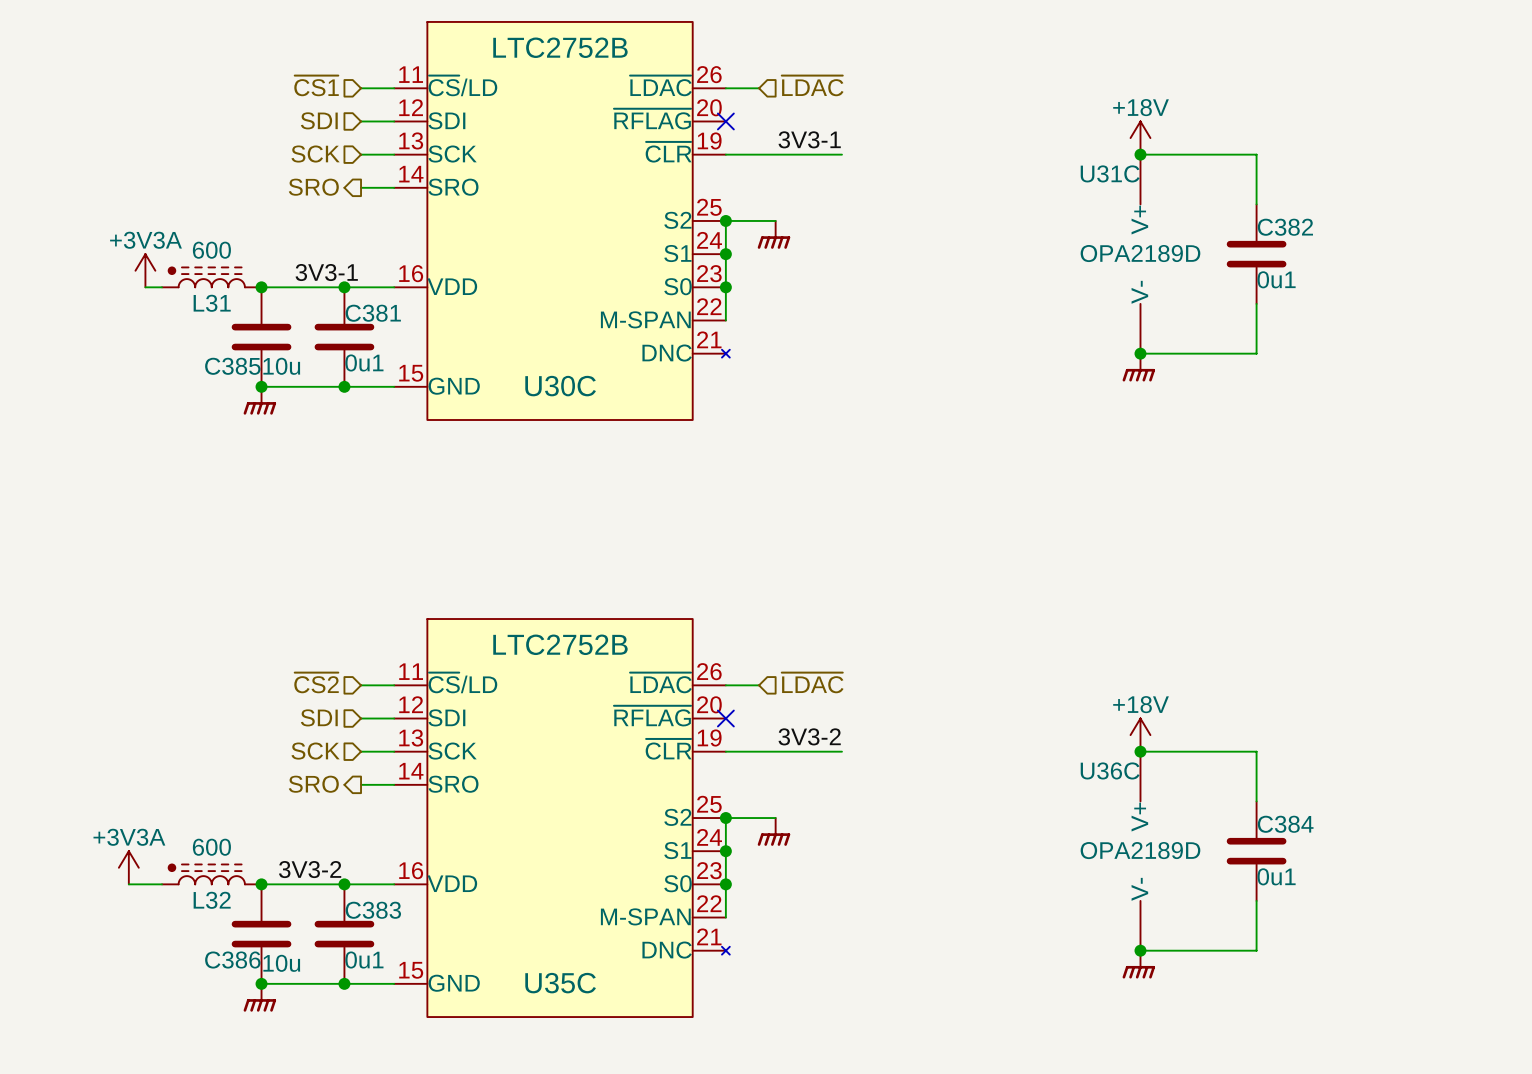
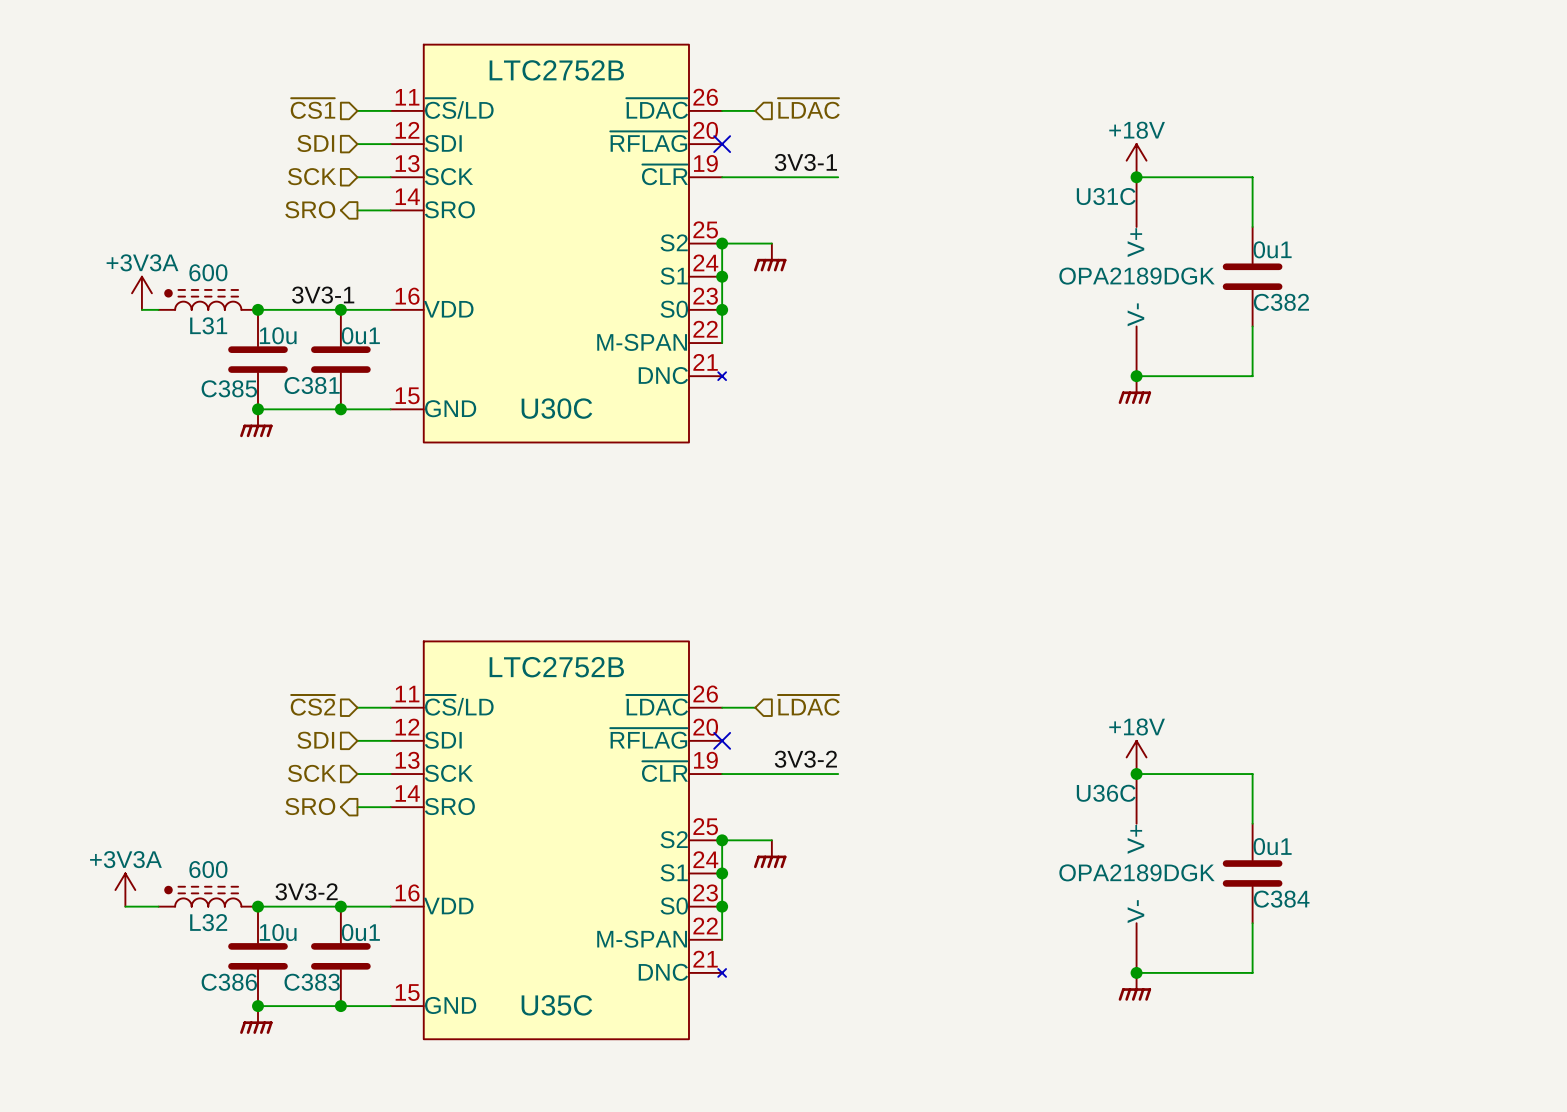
C382 name position: C382 (1285, 227) -> C382 (1281, 302)
U31C value: OPA2189D (1140, 253) -> OPA2189DGK (1137, 276)
C382 value position: 0u1 (1276, 279) -> 0u1 (1272, 249)
C381 name position: C381 (373, 313) -> C381 (312, 385)
C381 value position: 0u1 (364, 362) -> 0u1 (360, 335)
C385 value position: 10u (281, 366) -> 10u (278, 335)
C384 name position: C384 (1285, 824) -> C384 (1281, 899)
U36C value: OPA2189D (1140, 850) -> OPA2189DGK (1137, 872)
C384 value position: 0u1 (1276, 876) -> 0u1 (1272, 846)
C383 name position: C383 (373, 910) -> C383 (312, 982)
C383 value position: 0u1 (364, 960) -> 0u1 (360, 932)
C386 value position: 10u (281, 963) -> 10u (278, 932)

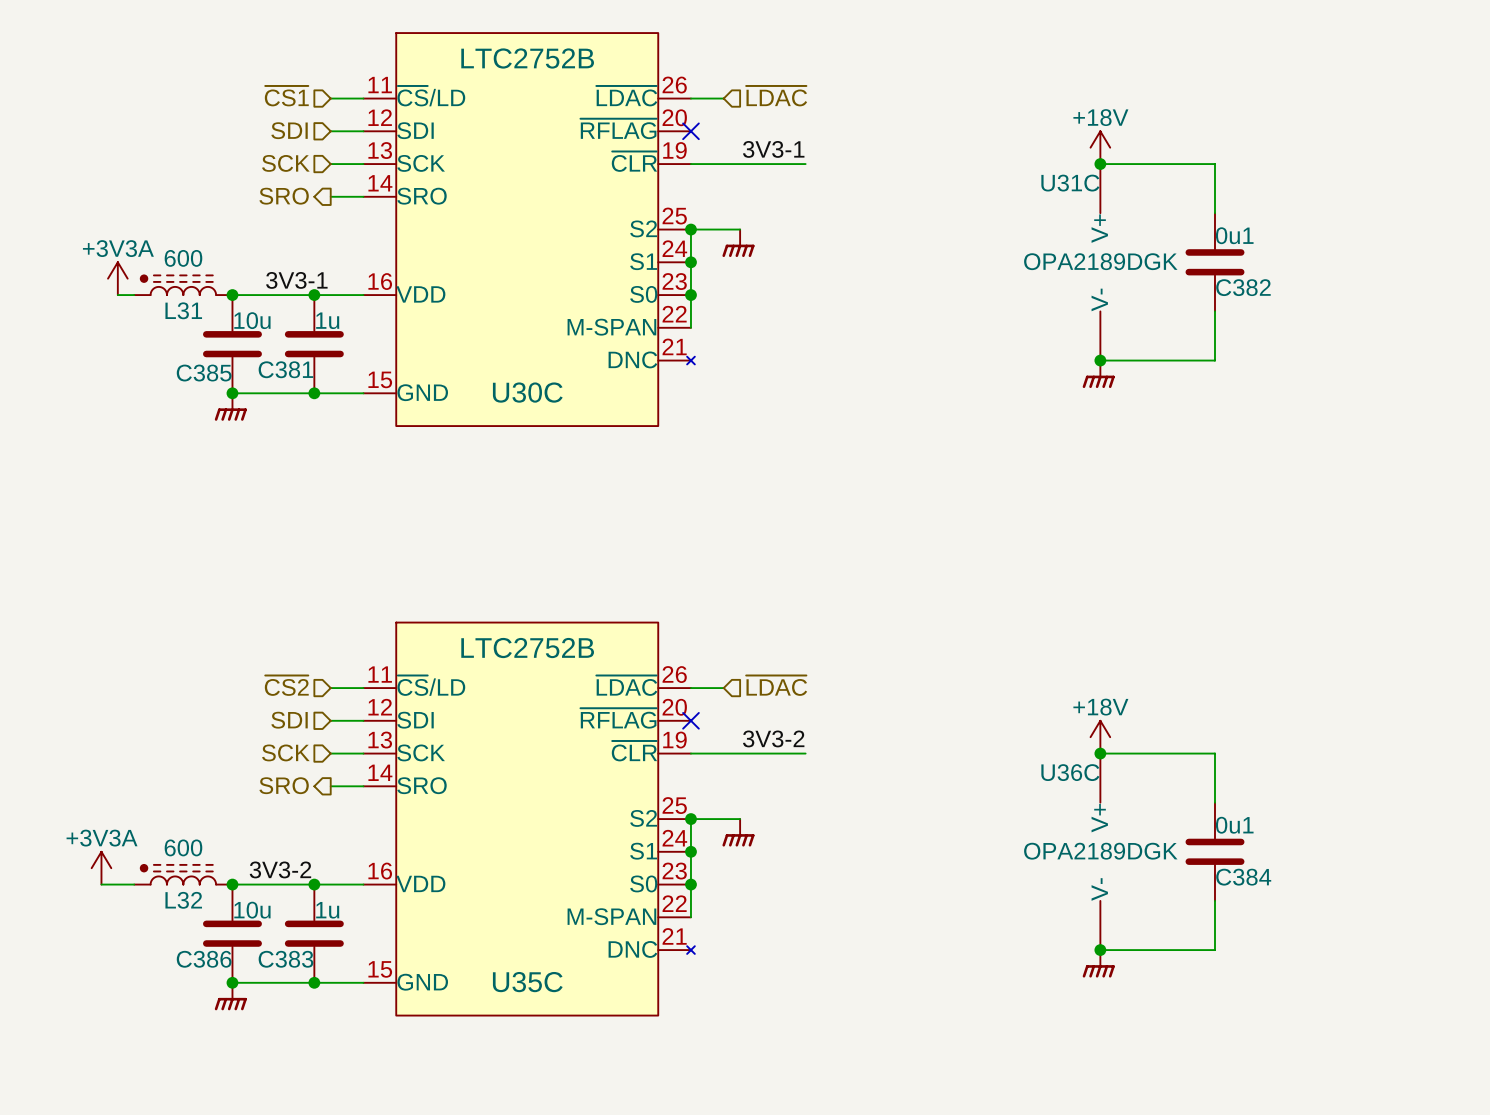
C381 value: 0u1 (360, 335) -> 1u (327, 320)
C383 value: 0u1 (360, 932) -> 1u (327, 910)

